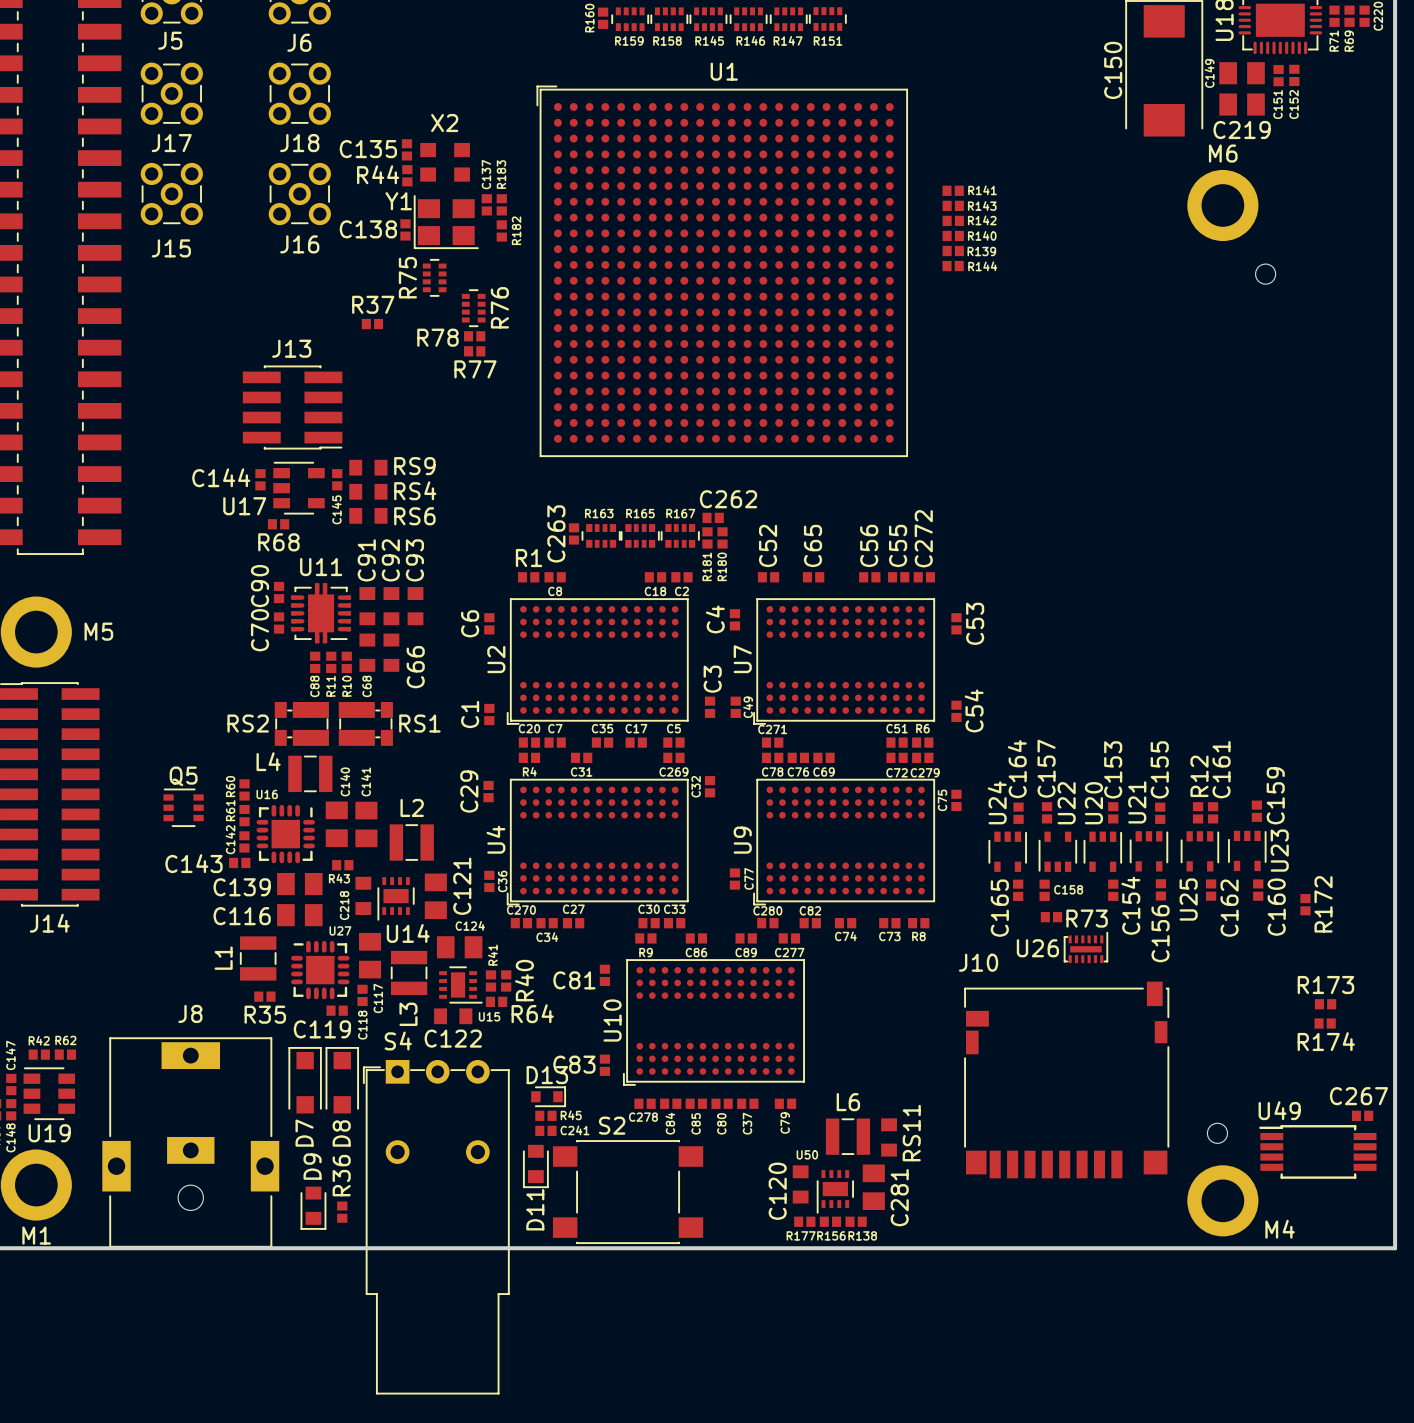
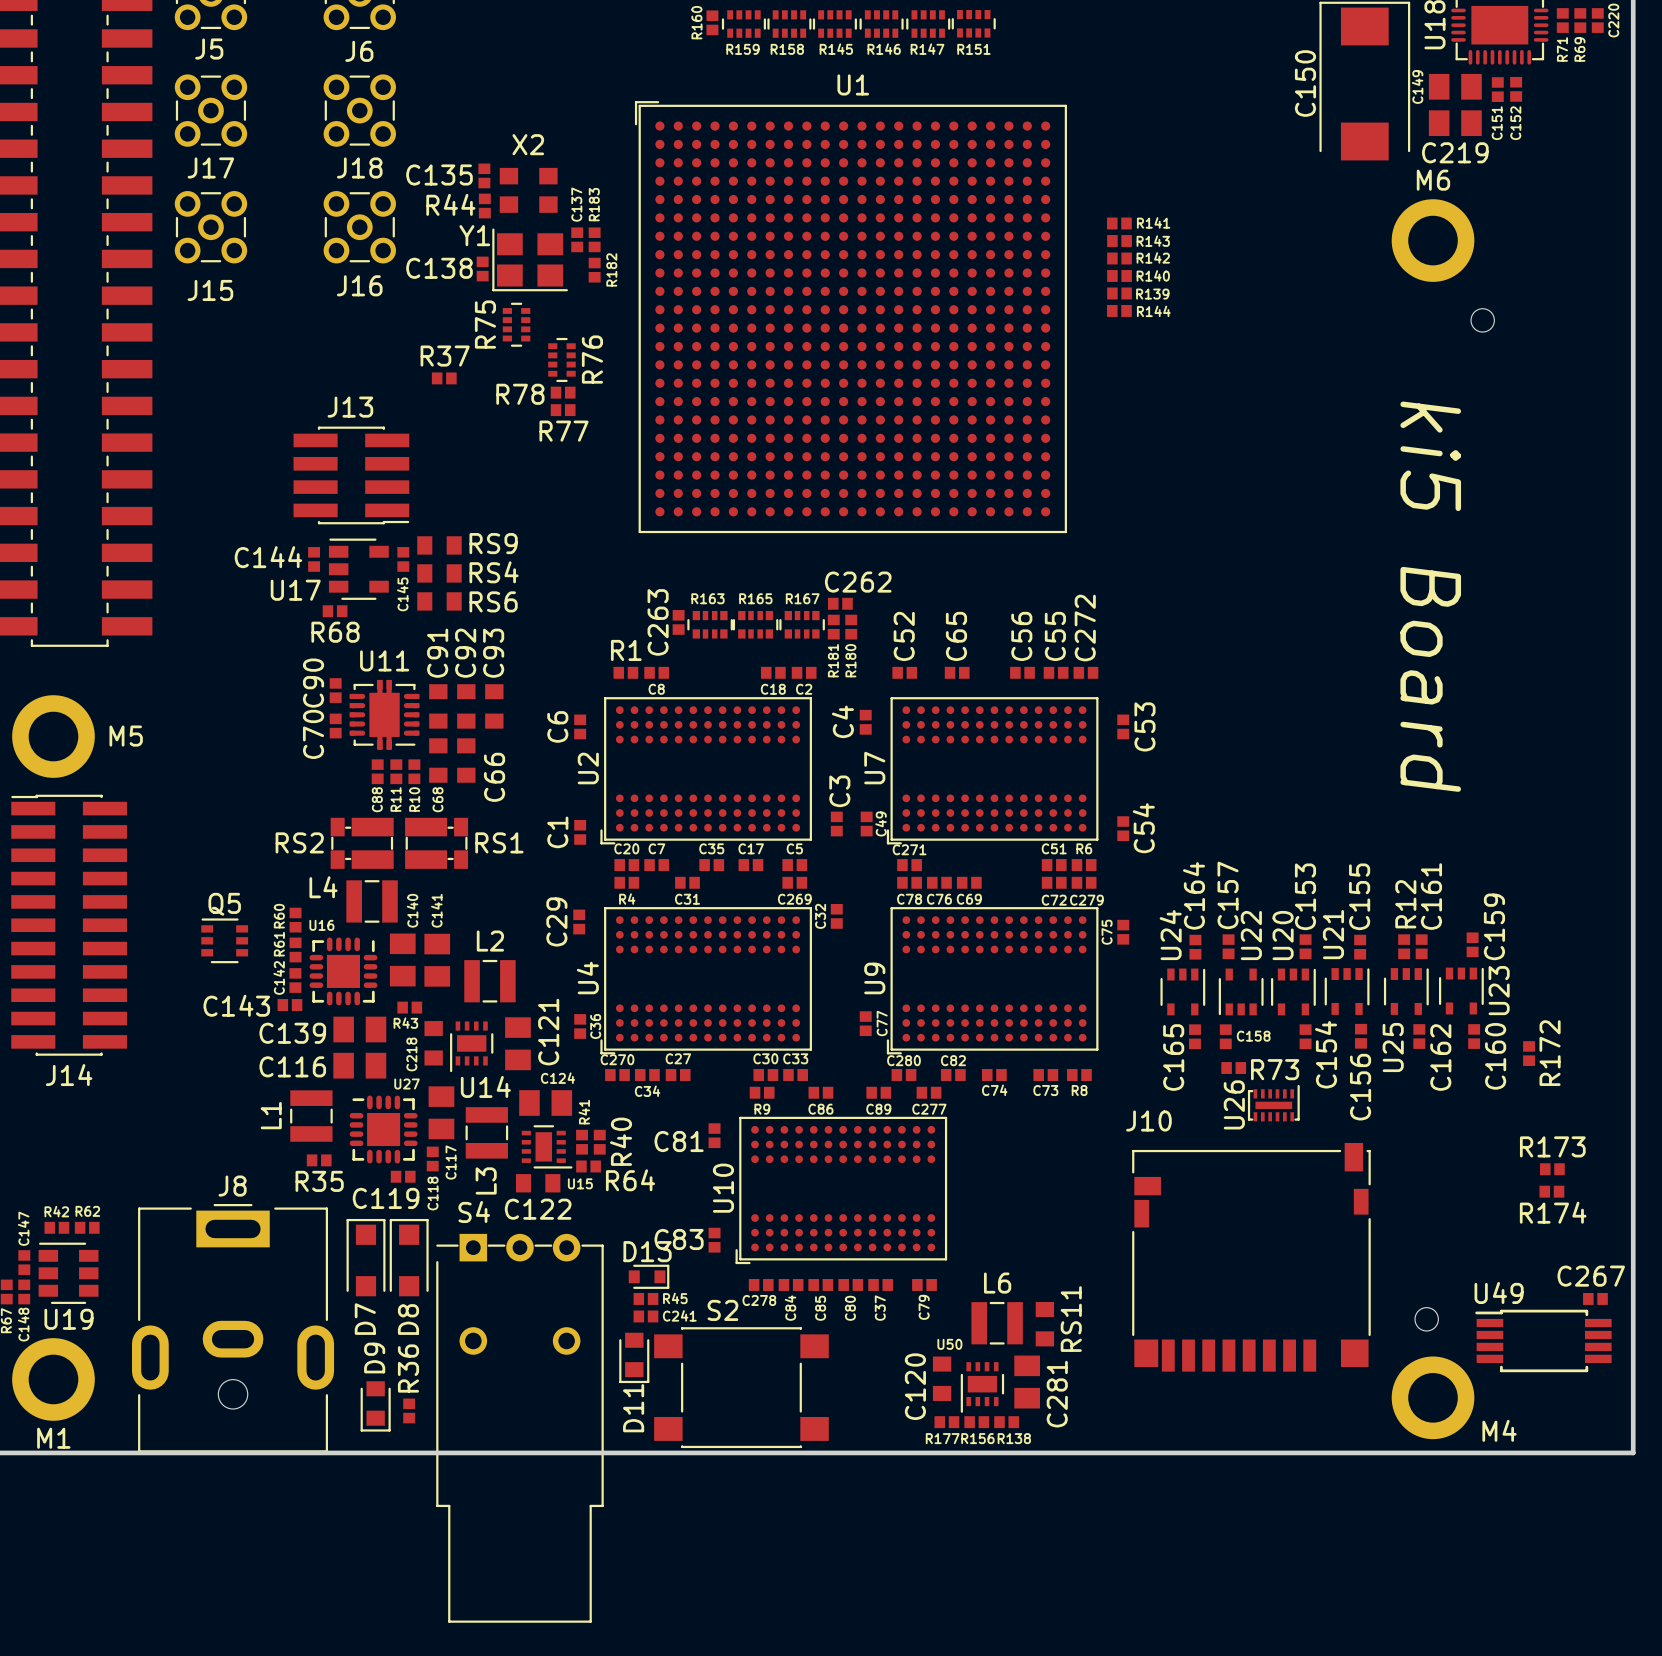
text: none -> ki5 Board (1430, 596)
U26 name rotation: 0° (1037, 948) -> 90° counterclockwise (1234, 1104)
J8 footprint: [102, 1037, 280, 1248] -> [132, 1204, 335, 1453]
S4 footprint: [362, 1059, 510, 1395] -> [436, 1233, 604, 1623]

